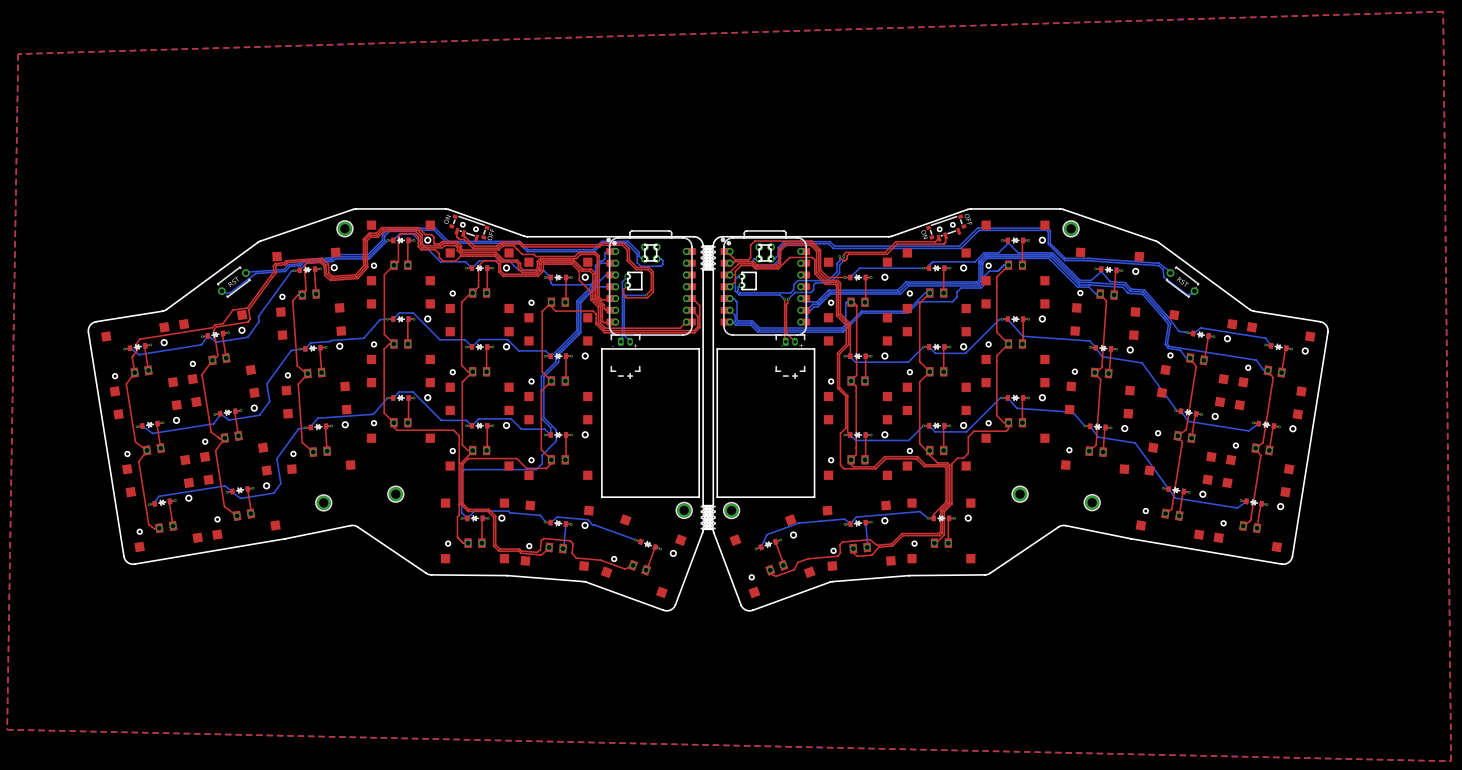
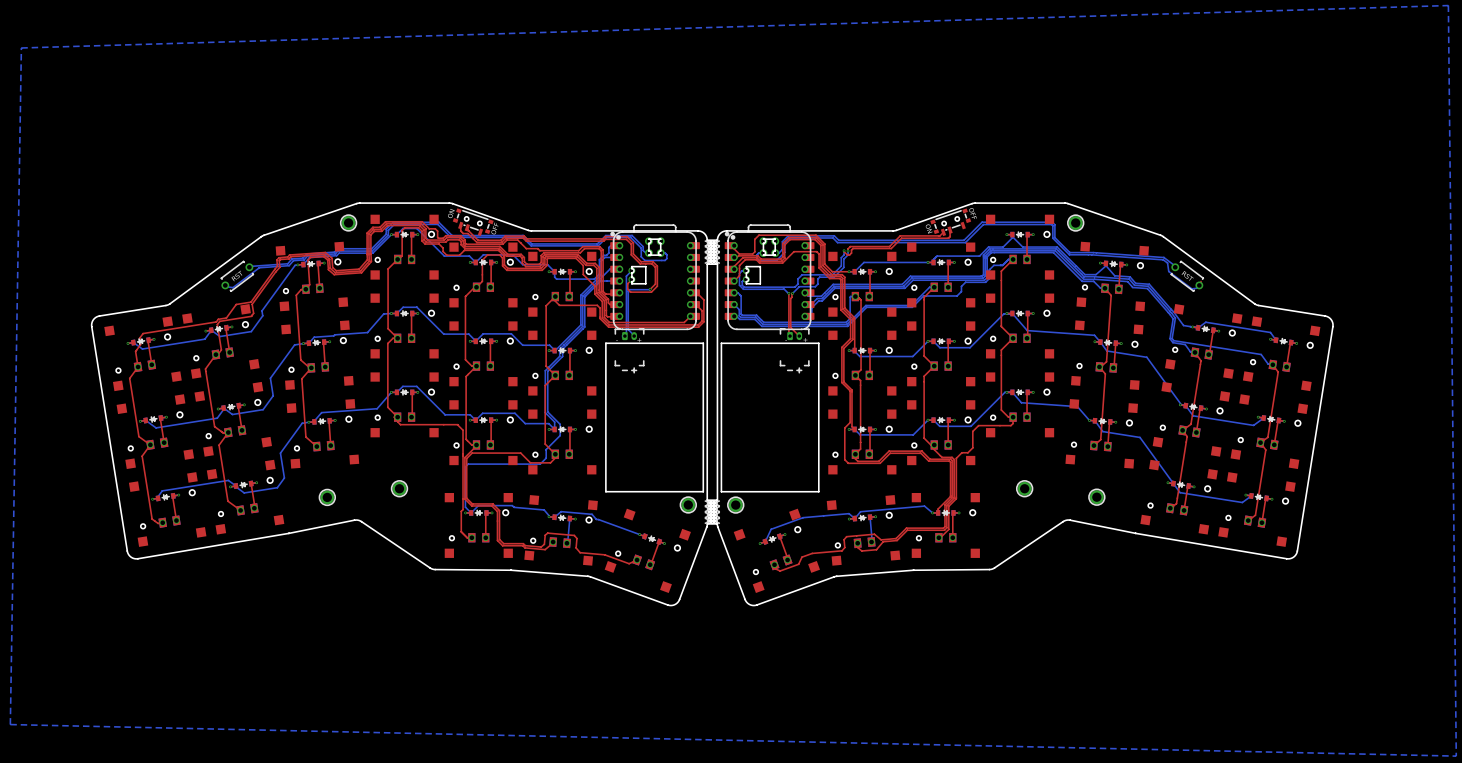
top zone outline: (1443, 11) (1451, 761) (7, 729) (18, 54) (1443, 11) -> none

